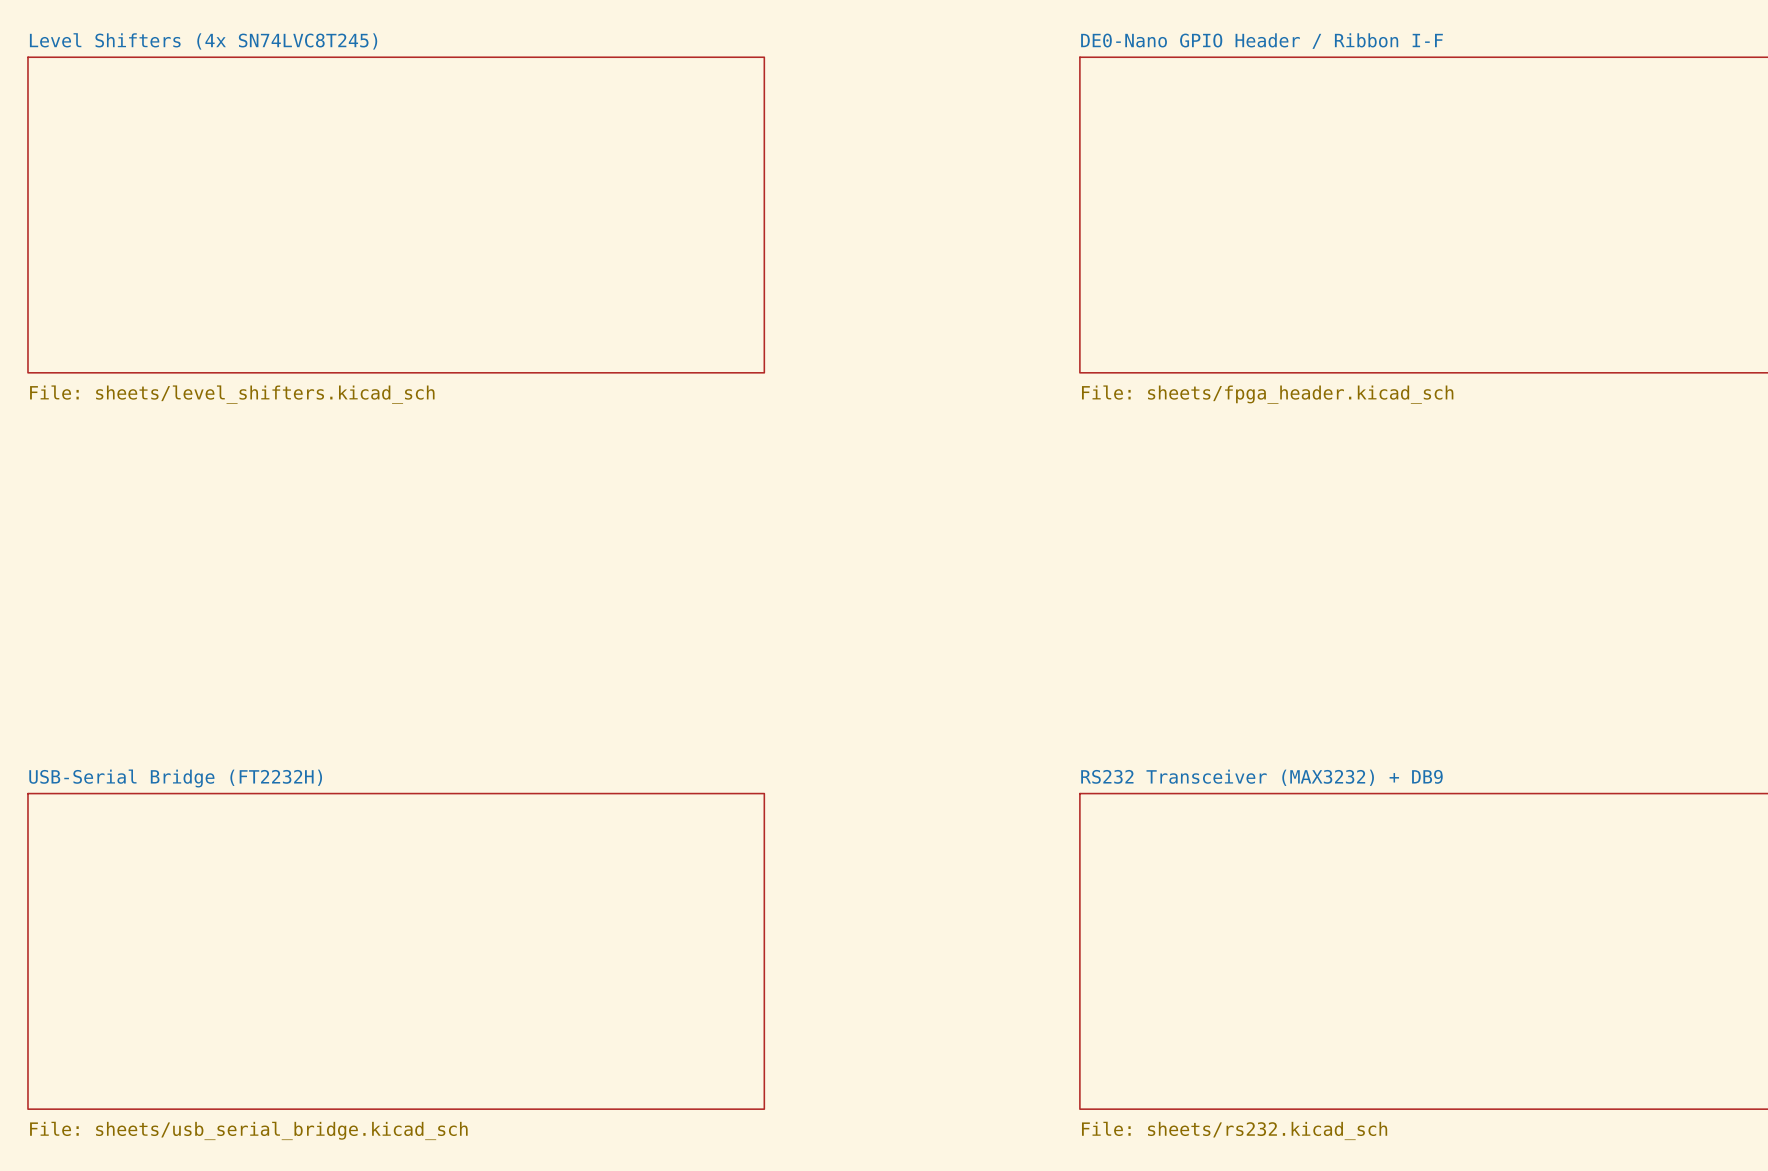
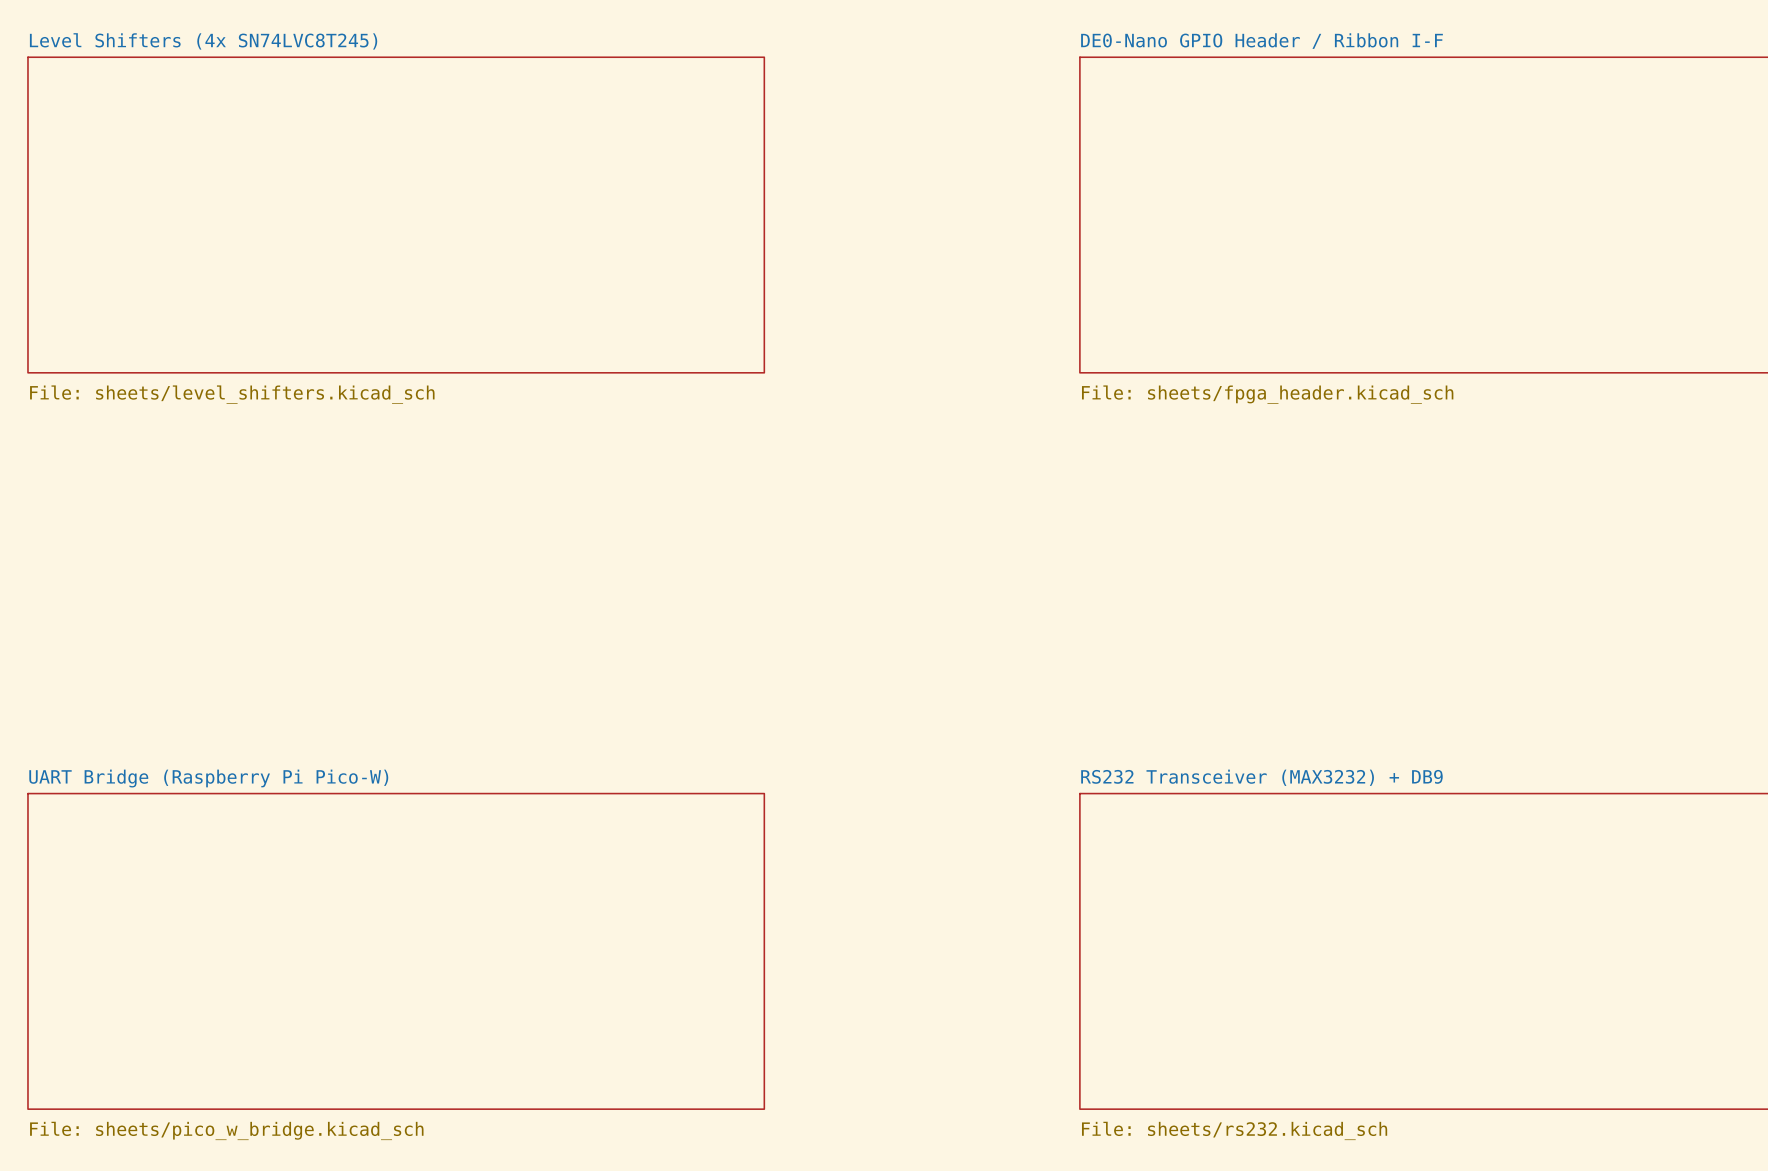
sheet USB-Serial Bridge (FT2232H) name: USB-Serial Bridge (FT2232H) (175, 778) -> UART Bridge (Raspberry Pi Pico-W) (208, 778)
sheet USB-Serial Bridge (FT2232H) value: File: sheets/usb_serial_bridge.kicad_sch (248, 1130) -> File: sheets/pico_w_bridge.kicad_sch (226, 1130)

